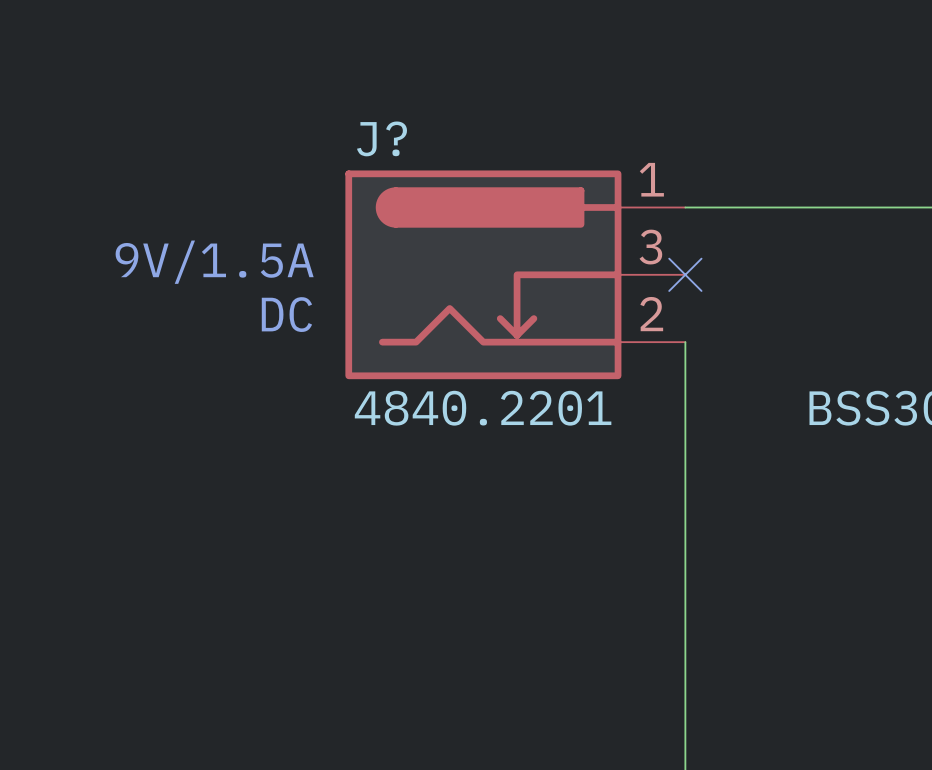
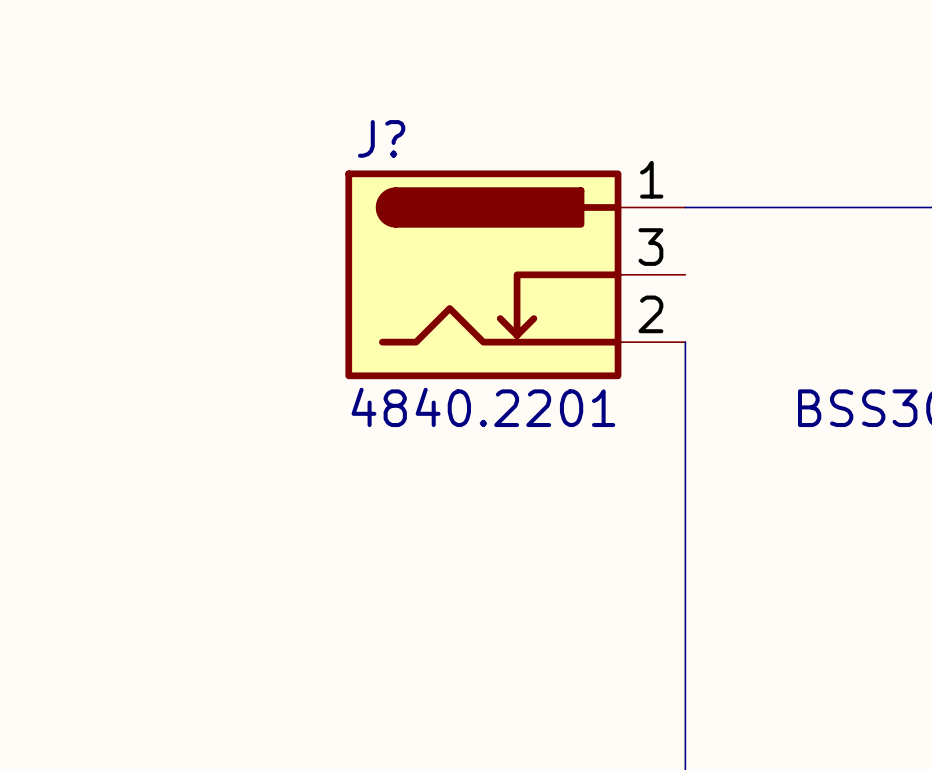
text: 9V/1.5A (214, 262) -> none
no-connect mark: (685, 274) -> none
text: DC (286, 314) -> none

